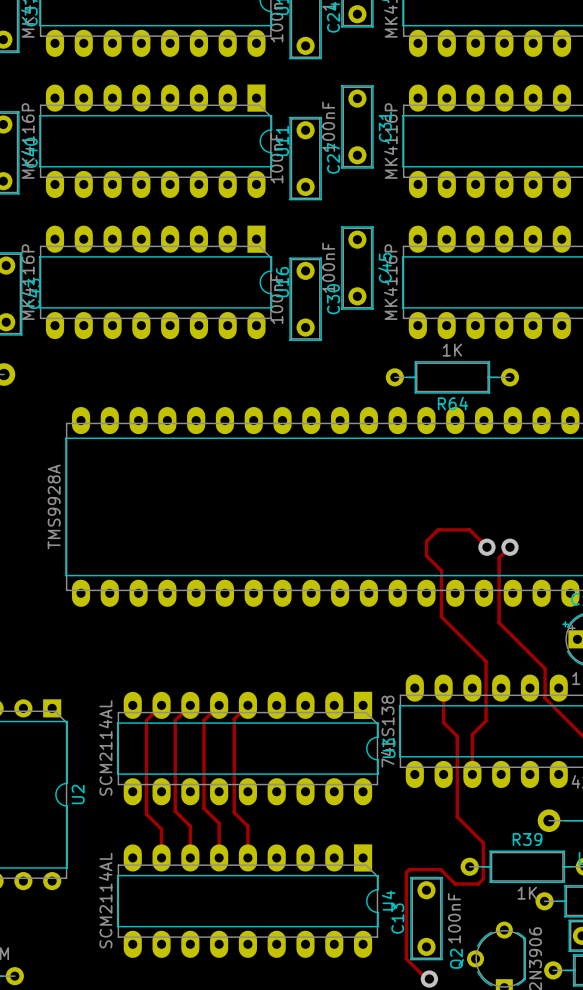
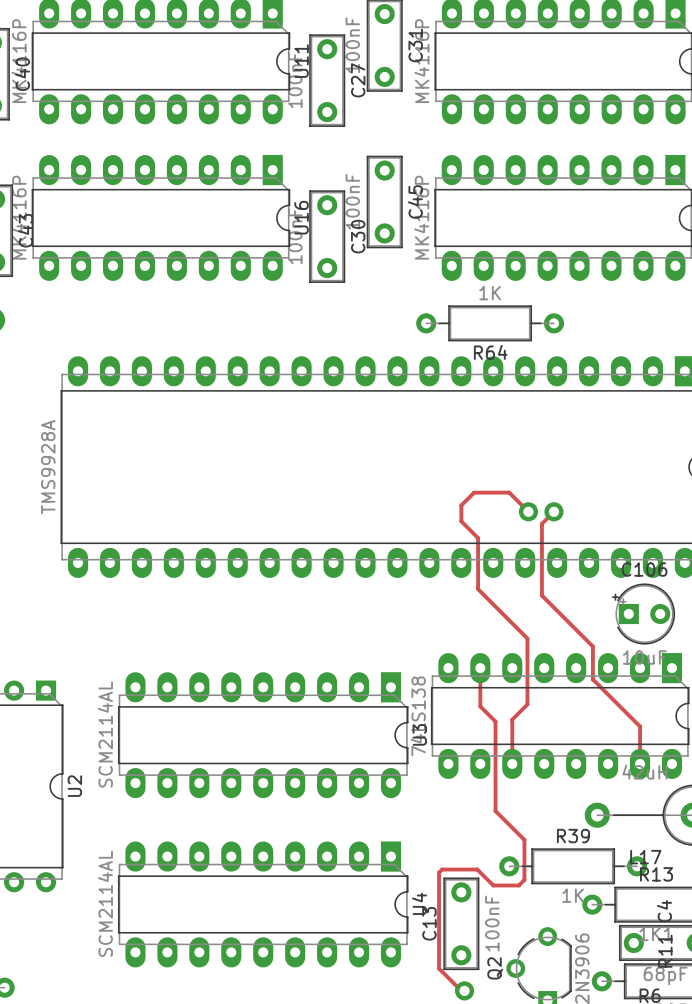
track: (161, 705) (146, 720) (146, 814) (161, 829) (161, 857) -> none
track: (190, 705) (175, 720) (175, 811) (190, 826) (190, 857) -> none
track: (219, 705) (204, 720) (204, 808) (219, 823) (219, 857) -> none
track: (247, 705) (234, 719) (234, 812) (247, 826) (247, 857) -> none

